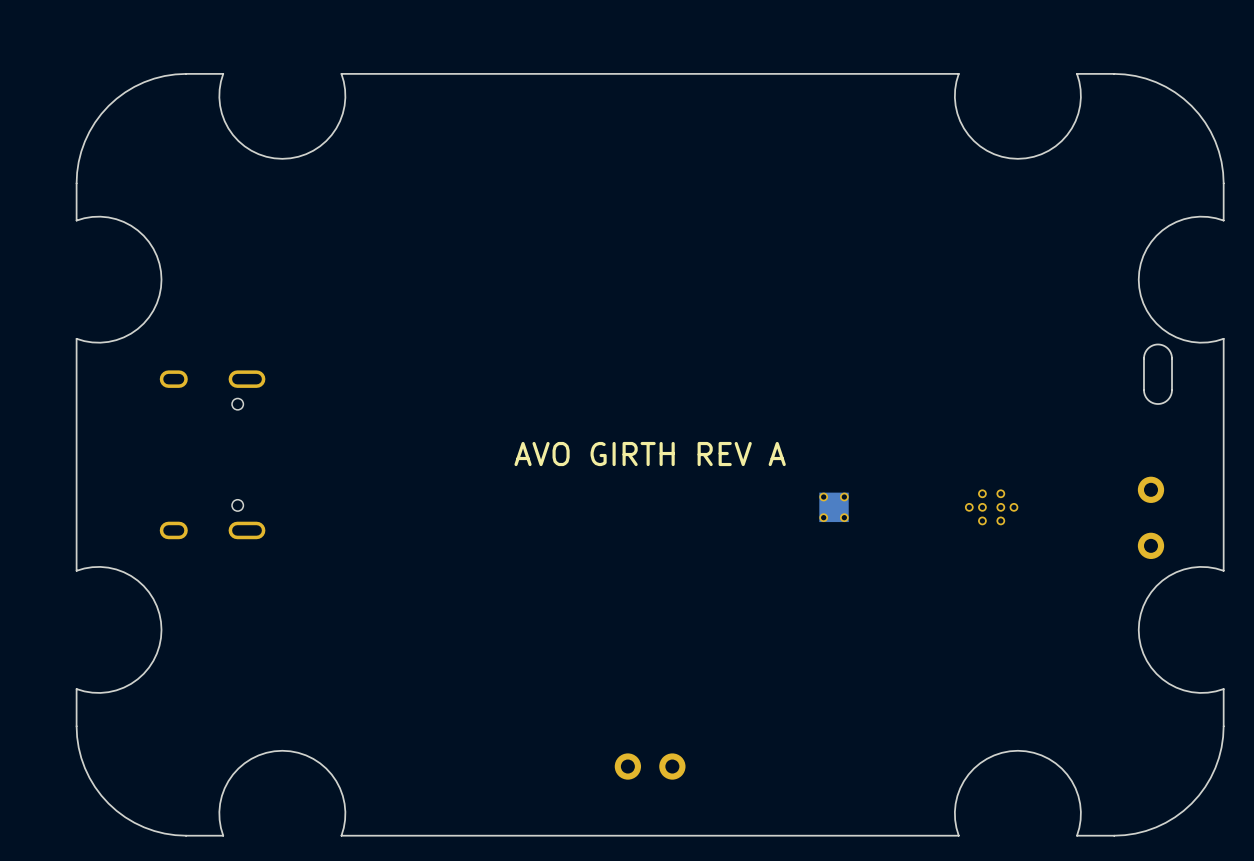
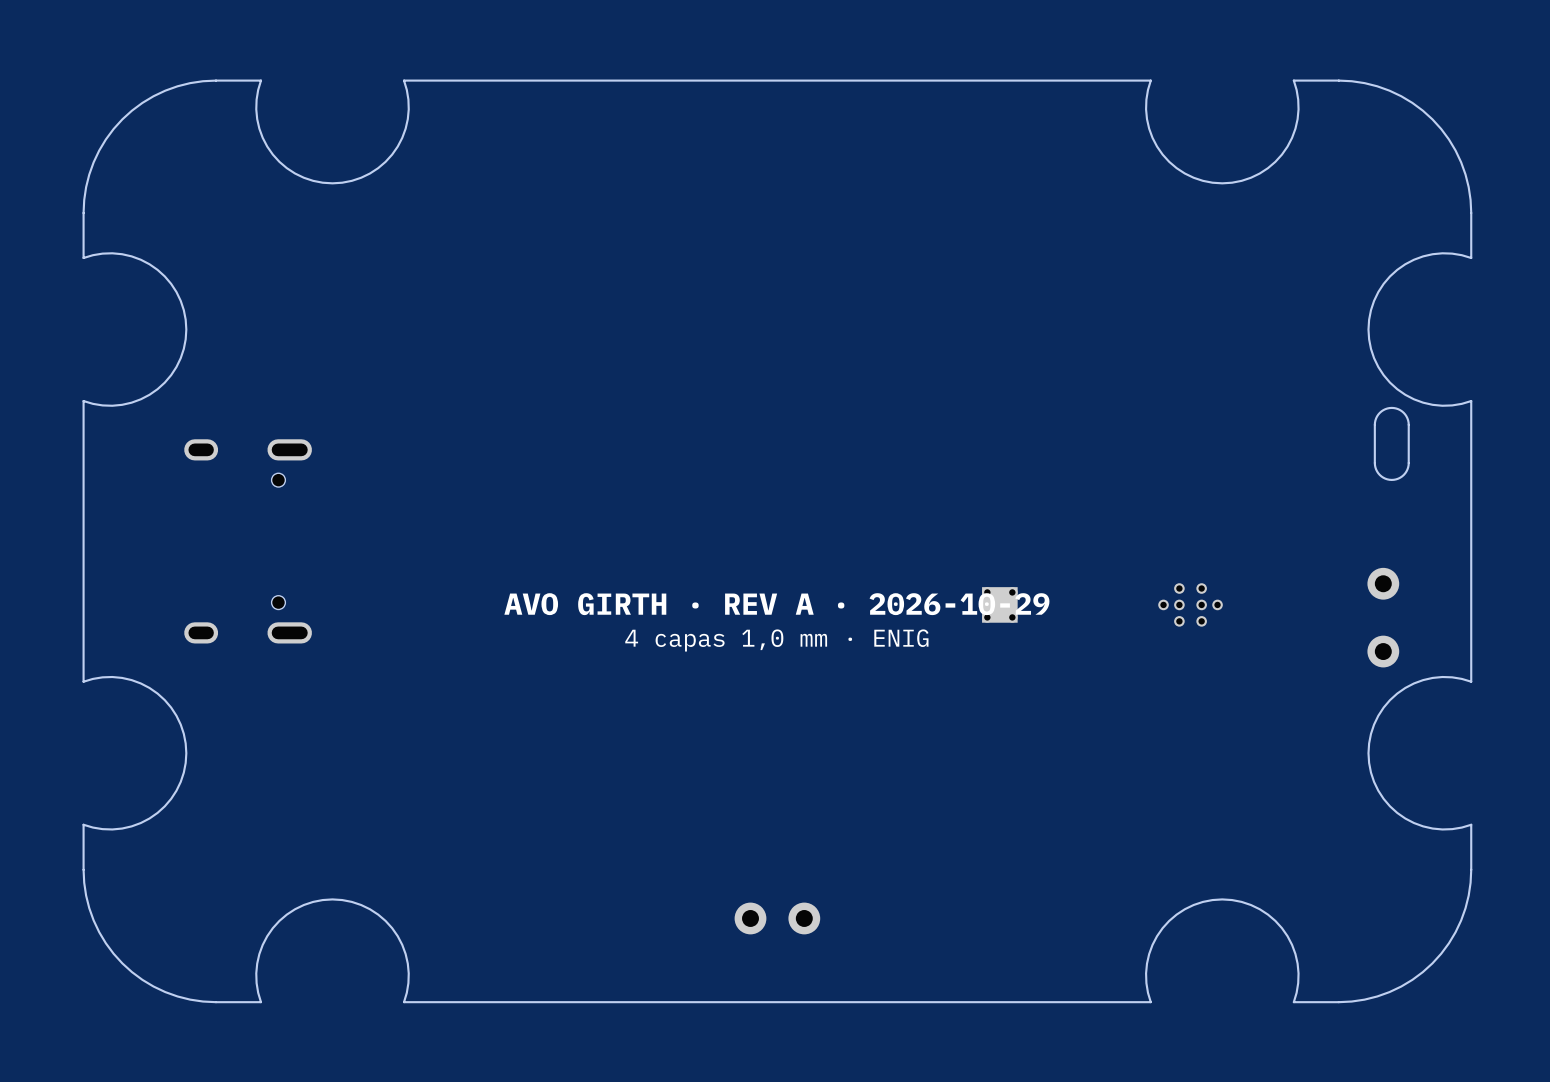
text: AVO GIRTH REV A (650, 454) -> none
text: none -> AVO GIRTH · REV A · 2026-10-29 (776, 604)
text: none -> 4 capas 1,0 mm · ENIG (776, 640)

